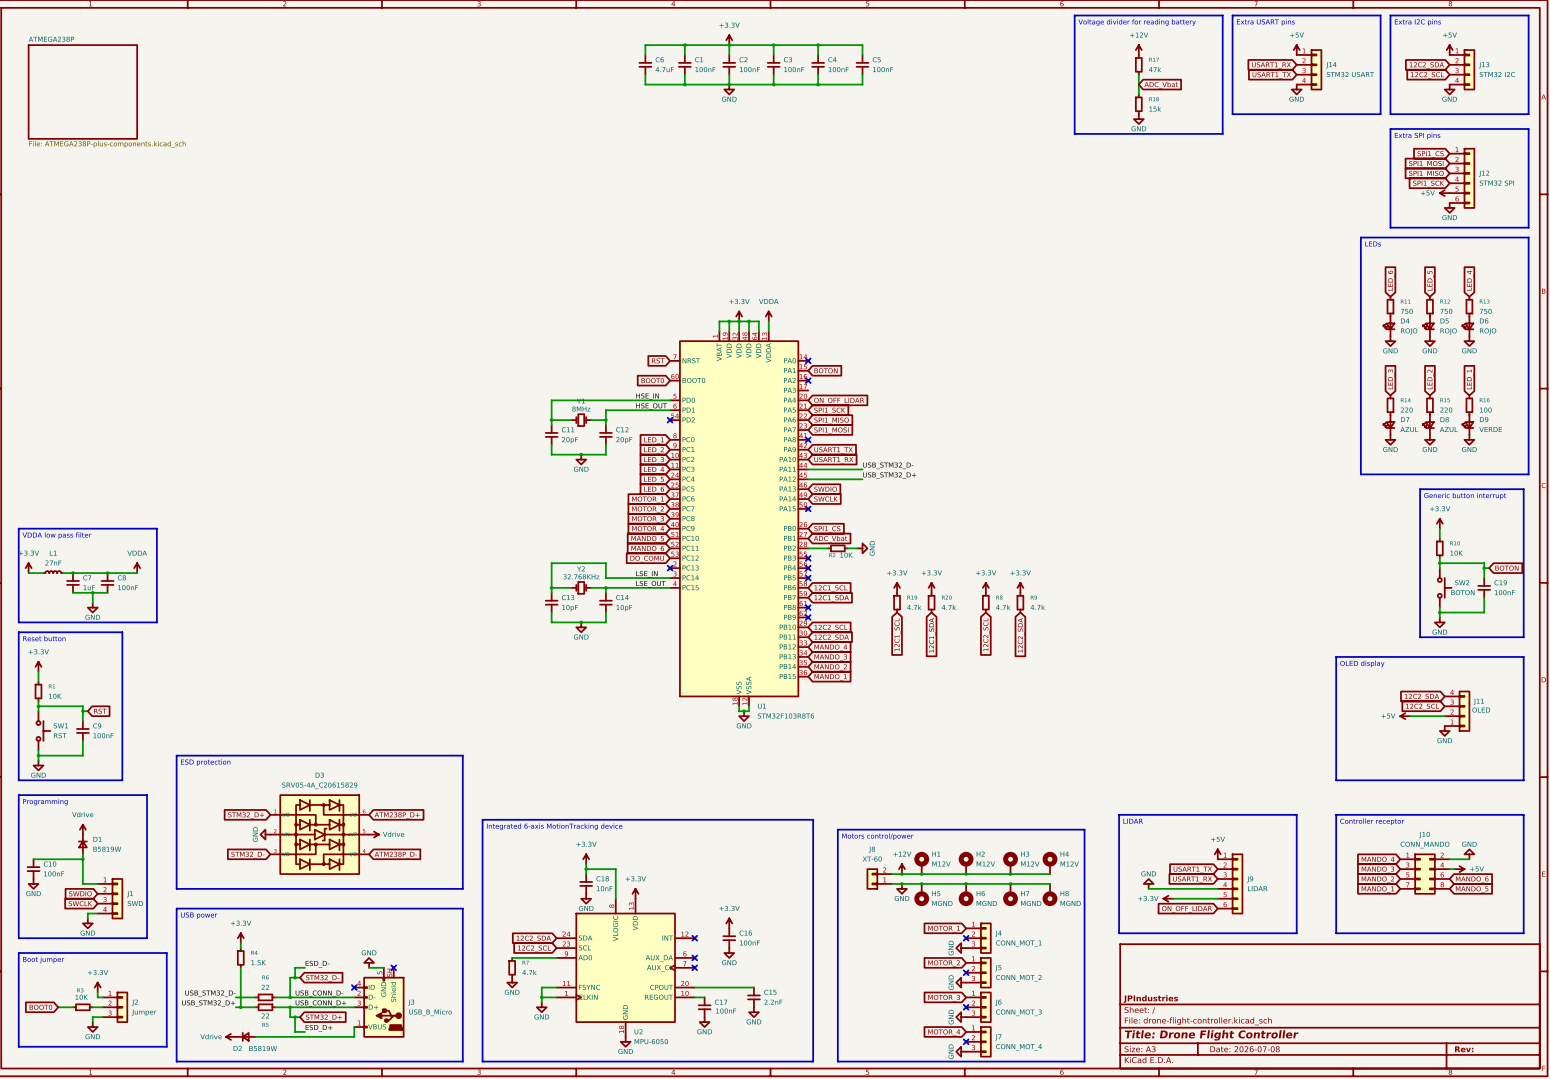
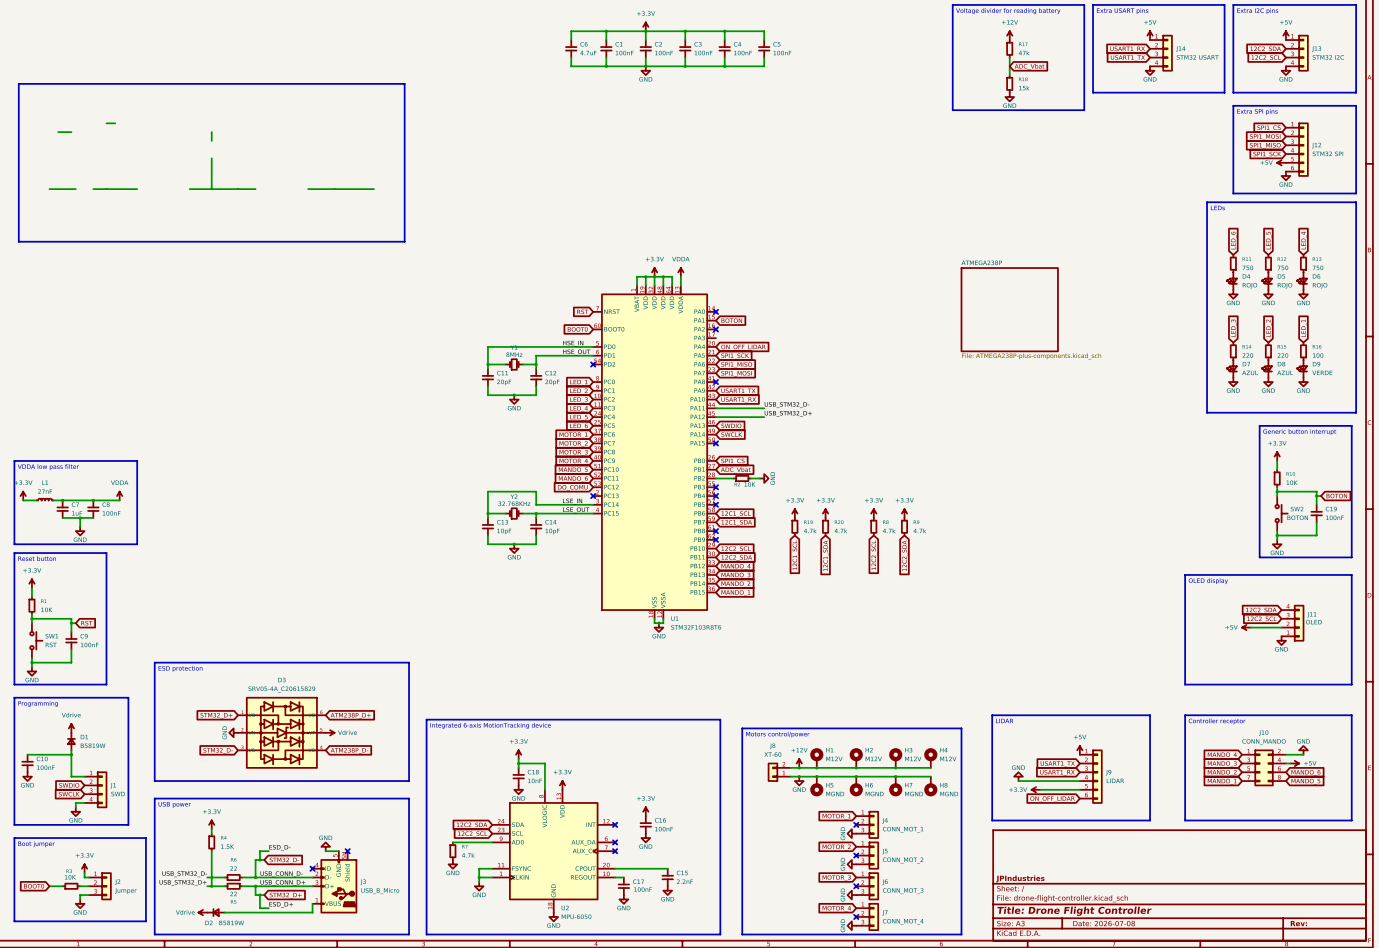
sheet position: (82, 91) -> (1009, 309)
line: none -> (18, 83) (404, 83) (404, 241) (18, 241) (18, 83)
wire: none -> (106, 123) (115, 123)
wire: none -> (58, 132) (71, 132)
wire: none -> (211, 132) (211, 140)
wire: none -> (211, 158) (211, 189)
wire: none -> (49, 189) (75, 189)
wire: none -> (93, 189) (137, 189)
wire: none -> (189, 189) (255, 189)
wire: none -> (308, 189) (373, 189)

